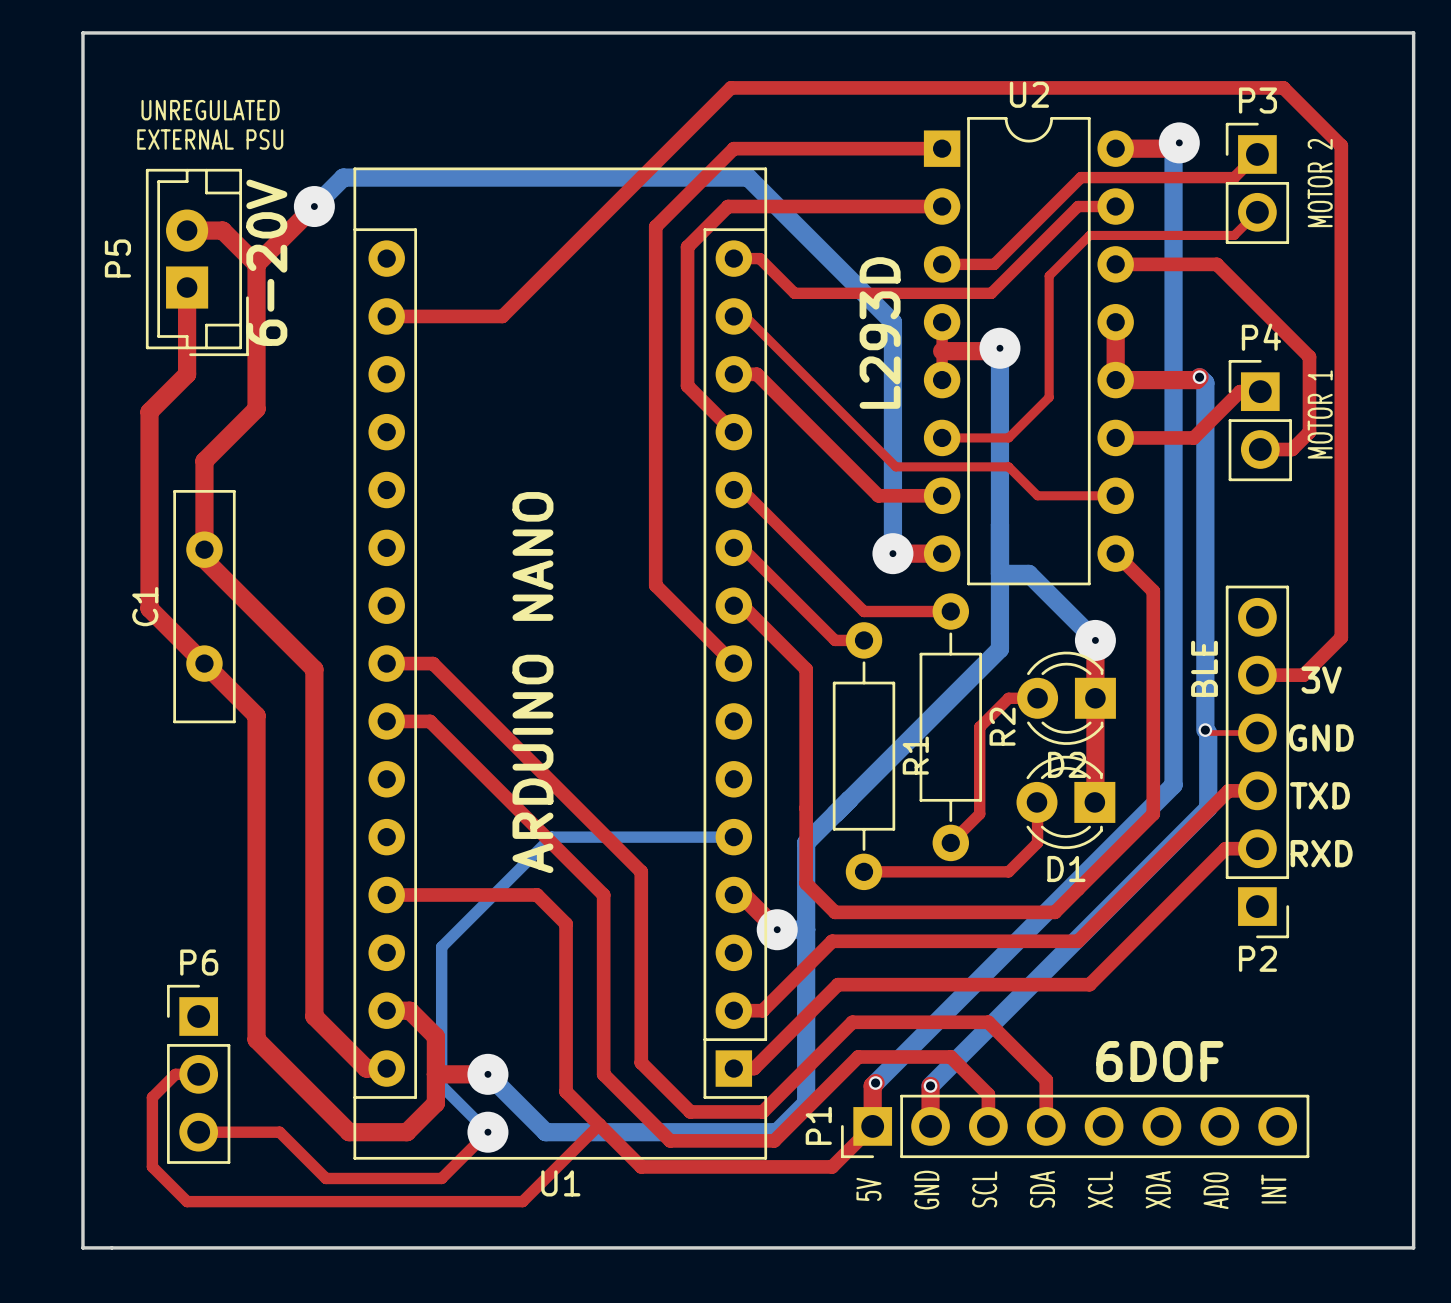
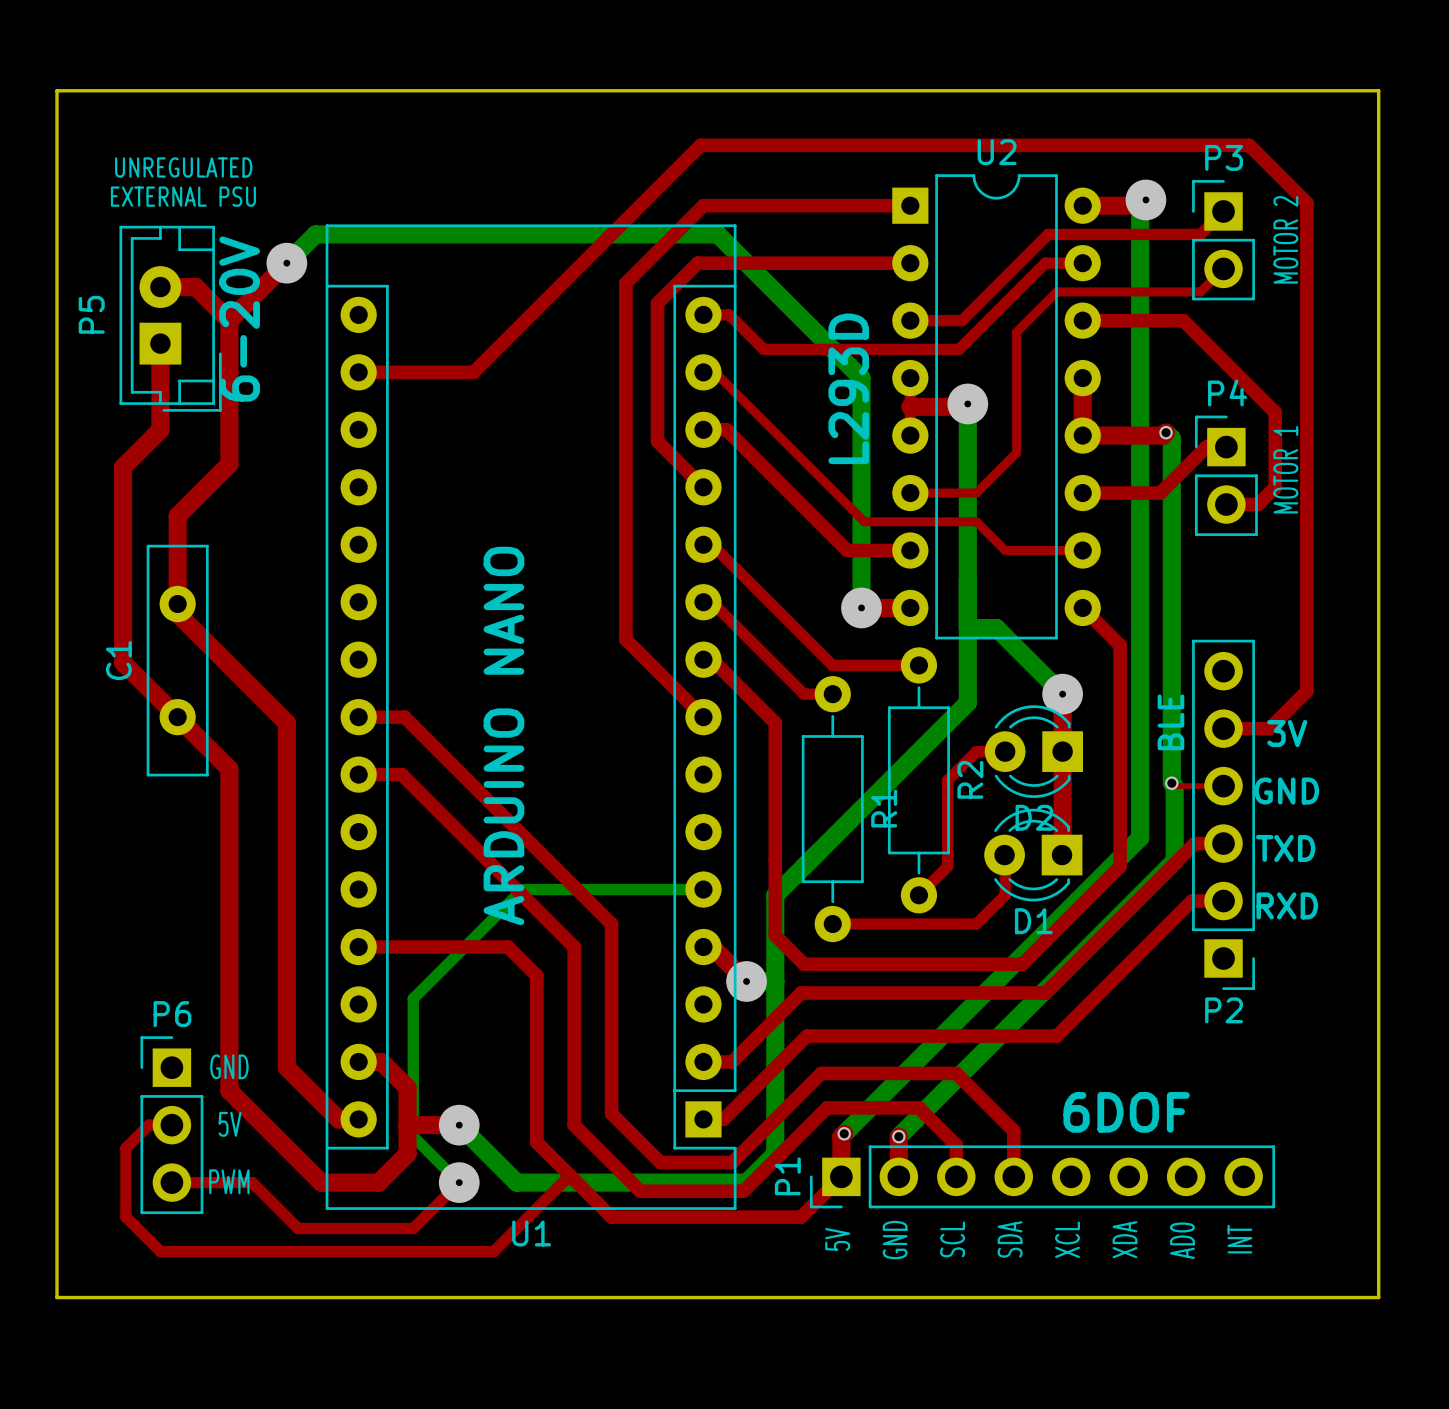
text: none -> GND (229, 1066)
text: none -> 5V (230, 1124)
text: none -> PWM (229, 1181)

